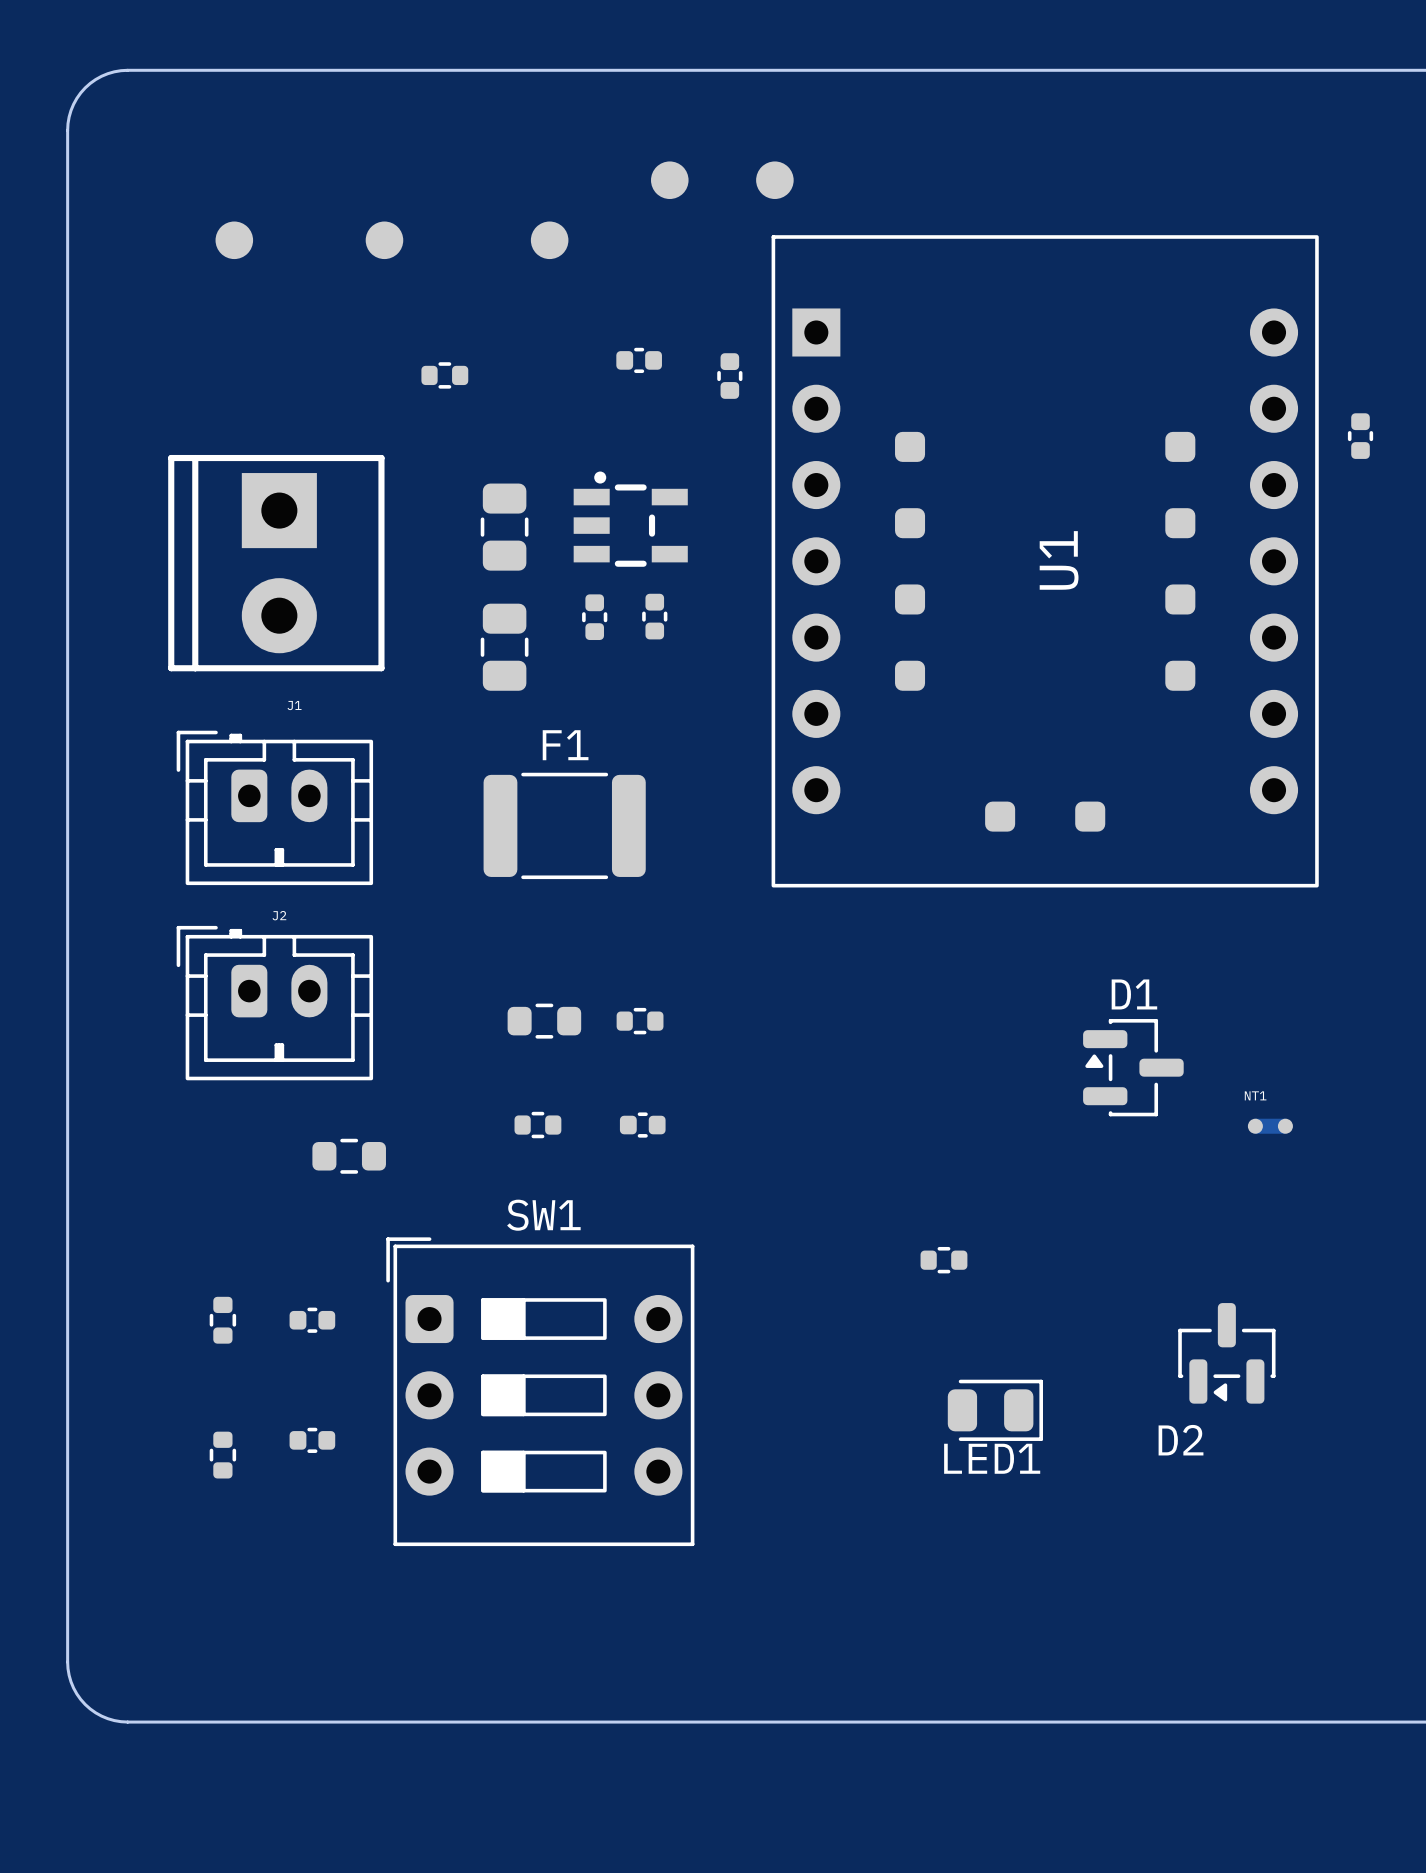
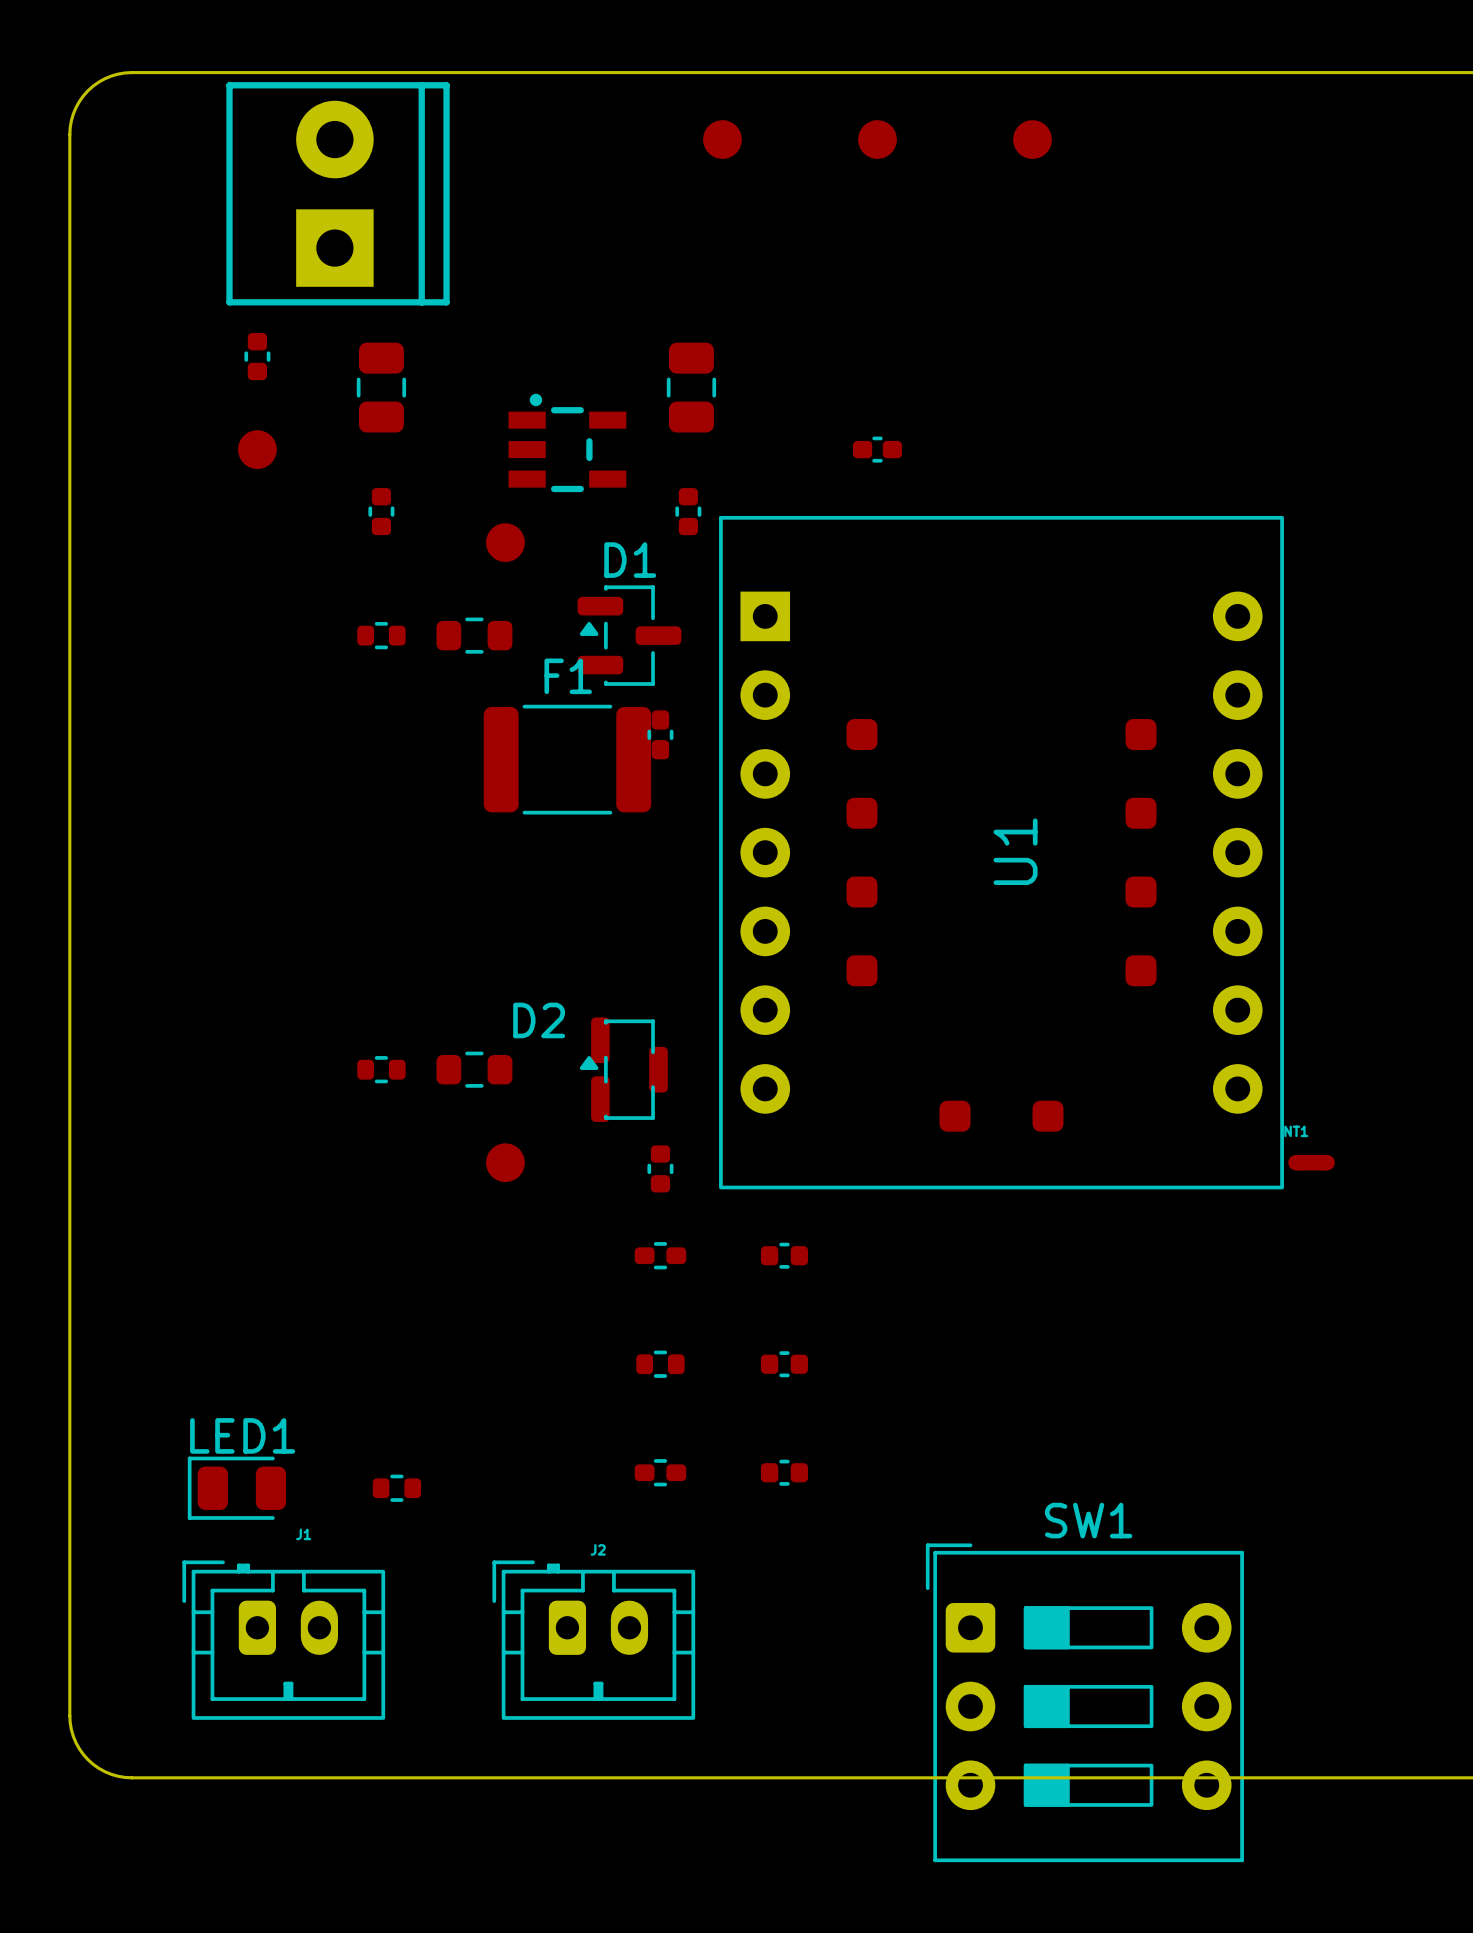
part: none -> (722, 139)
part: none -> (877, 139)
part: none -> (1032, 139)
part: (669, 180) -> none
part: (774, 180) -> none
part: (234, 240) -> none
part: (384, 240) -> none
part: (549, 240) -> none
part: none -> (257, 356)
part: (639, 360) -> none
part: none -> (381, 387)
part: (444, 375) -> none
part: none -> (691, 387)
part: (729, 376) -> none
part: none -> (257, 449)
part: none -> (877, 449)
part: (1360, 436) -> none
part footprint: [480, 483, 529, 571] -> [486, 523, 525, 562]
part: none -> (381, 511)
part: none -> (688, 511)
part position: (630, 519) -> (567, 442)
U1 position: (1045, 561) -> (1001, 852)
part rotation: 0° (276, 563) -> 180° (338, 193)
part position: (276, 563) -> (338, 193)
part: none -> (381, 635)
part: none -> (474, 635)
part: (654, 616) -> none
part: (594, 617) -> none
part: (504, 647) -> none
part: none -> (660, 734)
J1 position: (274, 807) -> (283, 1640)
F1 position: (564, 825) -> (567, 759)
J2 position: (274, 1003) -> (593, 1640)
part: (544, 1021) -> none
part: (640, 1021) -> none
part: none -> (381, 1069)
part: none -> (474, 1069)
D1 position: (1133, 1067) -> (629, 635)
part: (537, 1125) -> none
part rotation: 0° (642, 1125) -> 90° clockwise (660, 1168)
part: none -> (505, 1162)
part: (349, 1156) -> none
part: none -> (660, 1255)
part: none -> (784, 1255)
part: (943, 1260) -> none
D2 footprint: [1178, 1303, 1276, 1404] -> [579, 1017, 668, 1123]
part: (222, 1320) -> none
part: (312, 1320) -> none
part: none -> (660, 1364)
part: none -> (784, 1364)
SW1 position: (540, 1391) -> (1084, 1702)
LED1 rotation: 0° (995, 1410) -> 180° (236, 1488)
LED1 position: (995, 1410) -> (236, 1488)
part: none -> (660, 1472)
part: none -> (784, 1472)
part: (312, 1440) -> none
D2 name position: D2 (1181, 1440) -> D2 (539, 1020)
part: none -> (396, 1488)
part: (222, 1455) -> none

